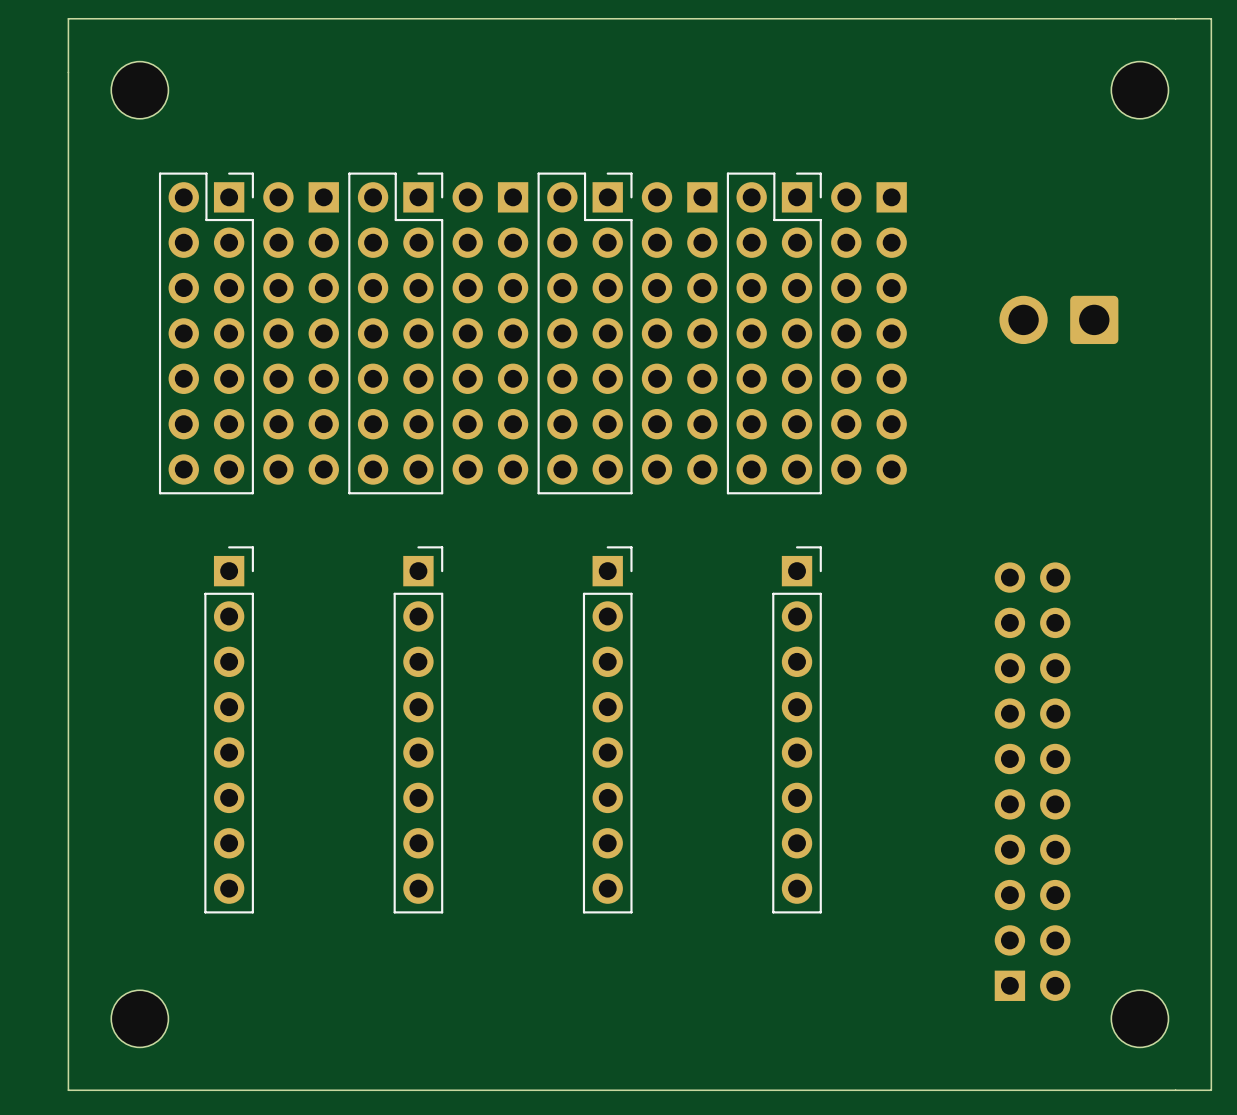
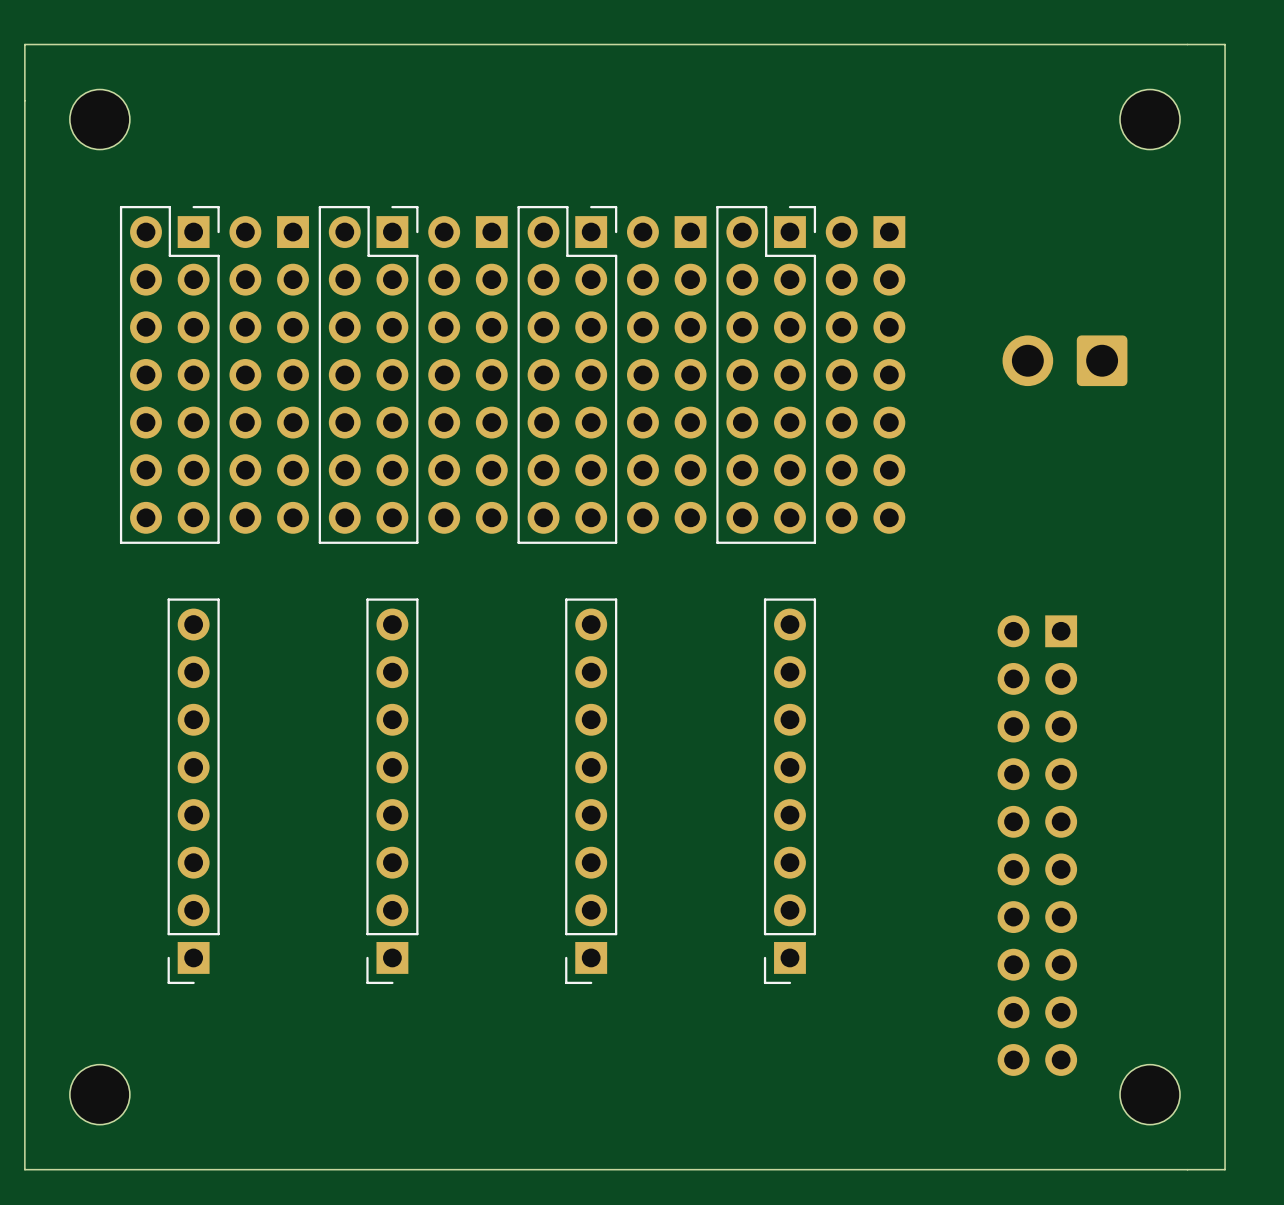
part rotation: 0° (229, 729) -> 180° (193, 791)
part rotation: 0° (418, 729) -> 180° (392, 791)
part rotation: 0° (607, 729) -> 180° (591, 791)
part rotation: 0° (797, 729) -> 180° (789, 791)
part rotation: 0° (1032, 781) -> 180° (1037, 845)

